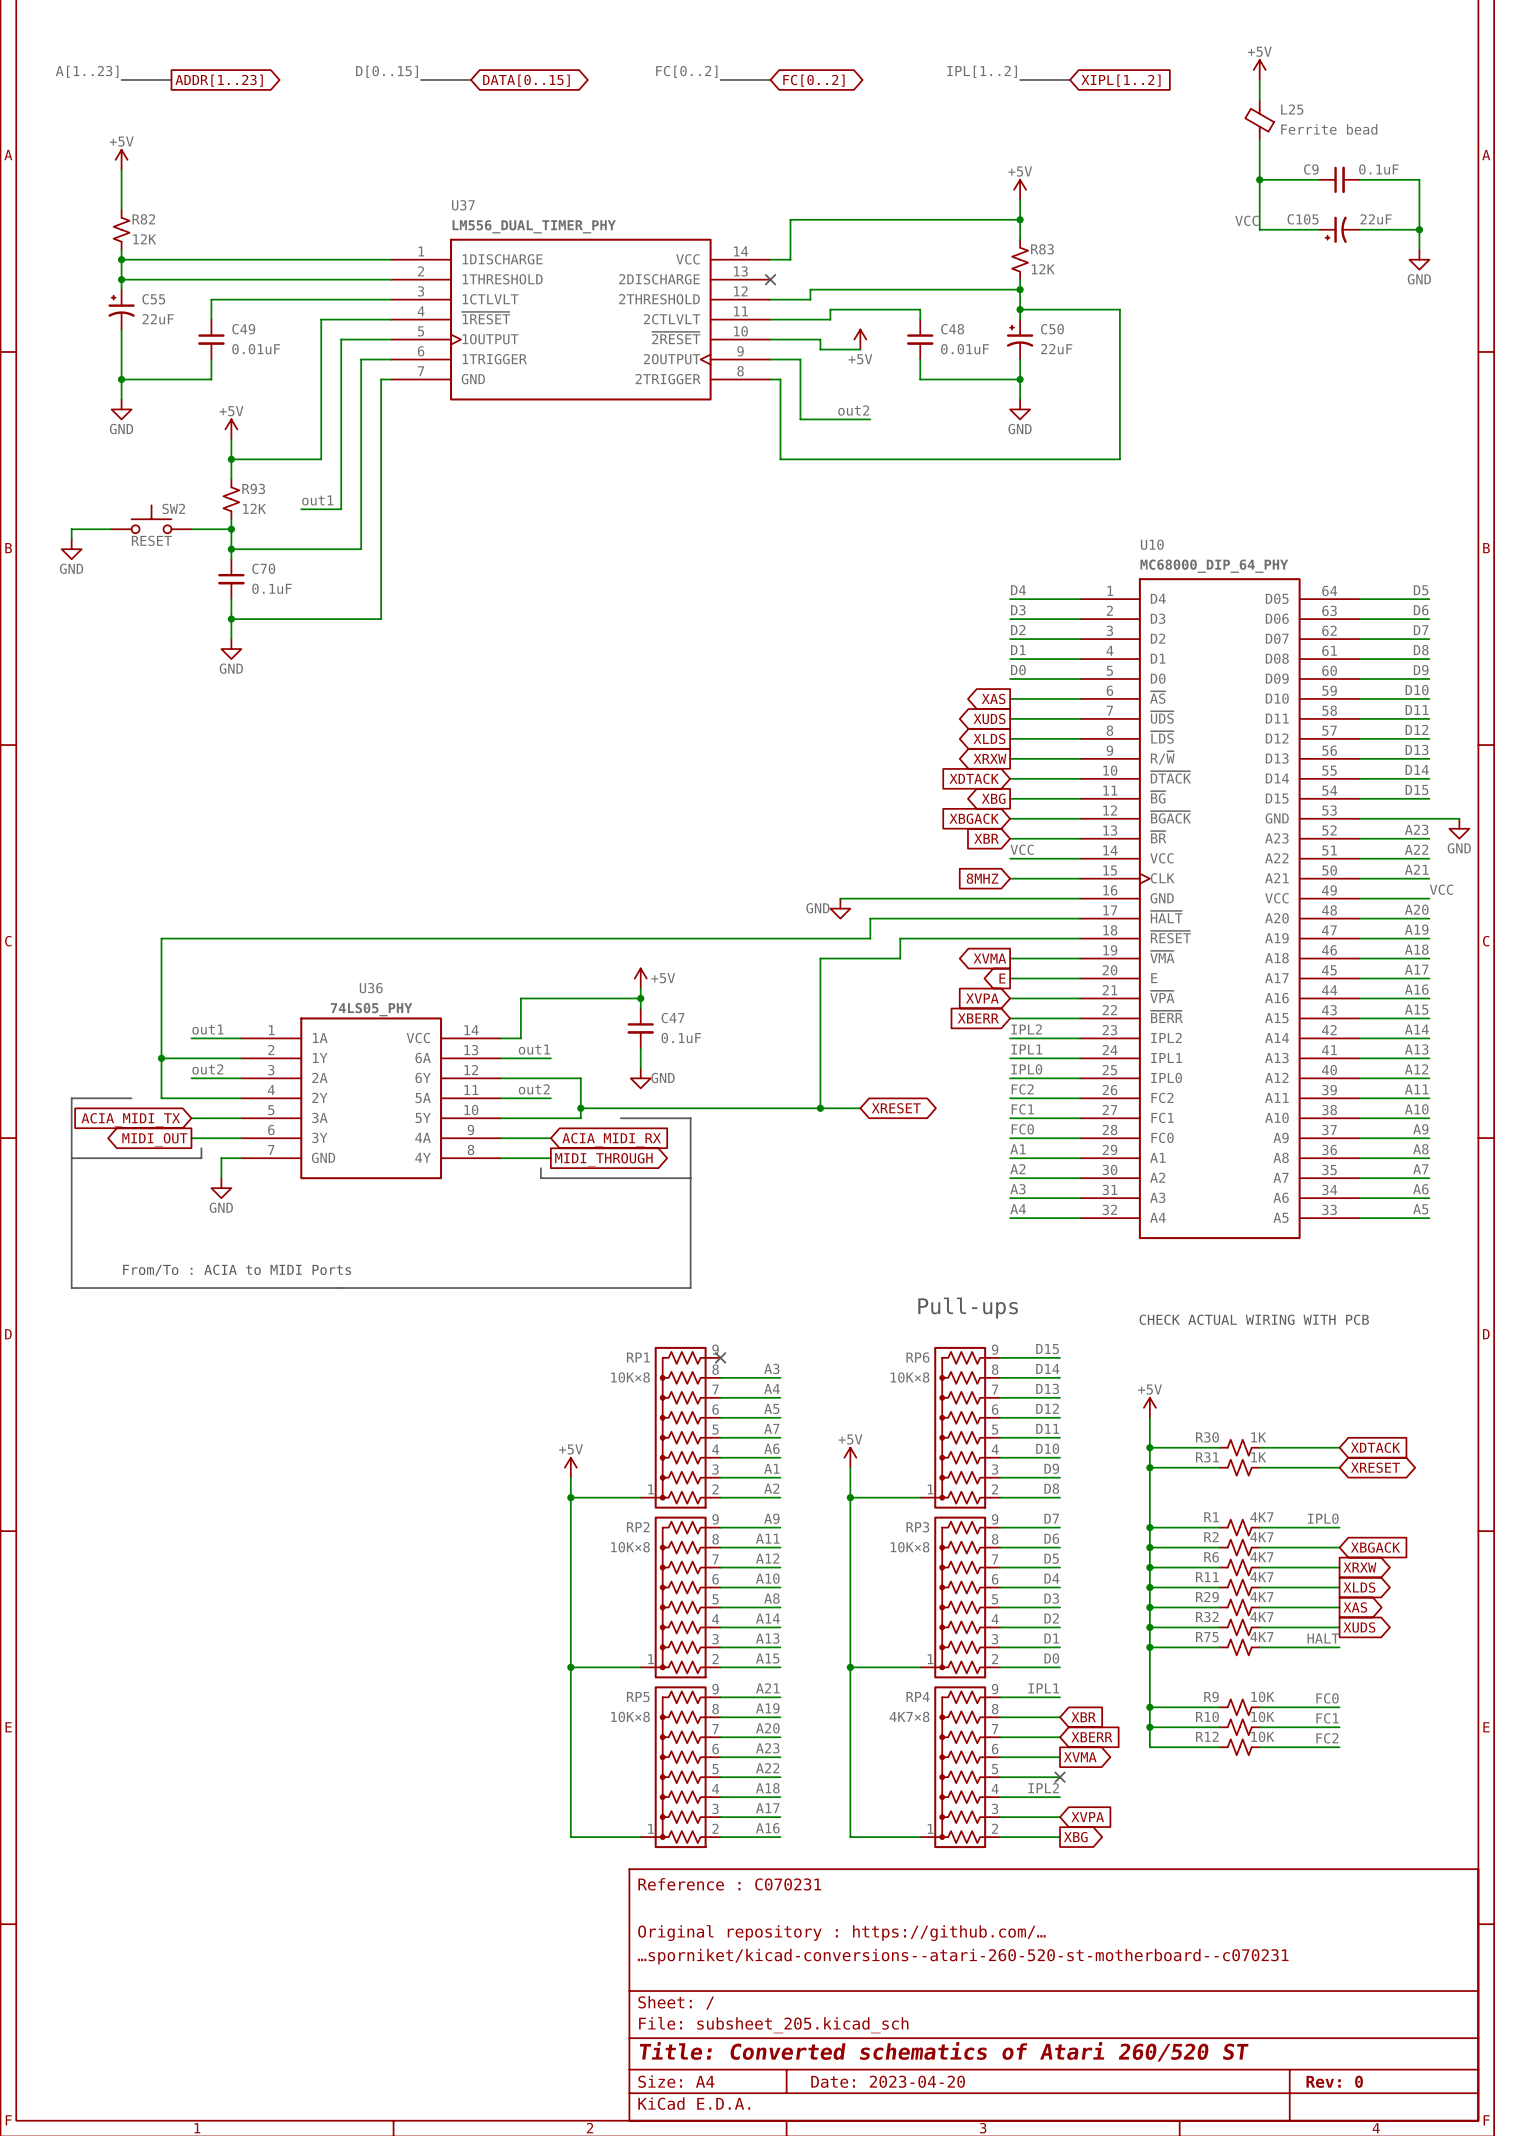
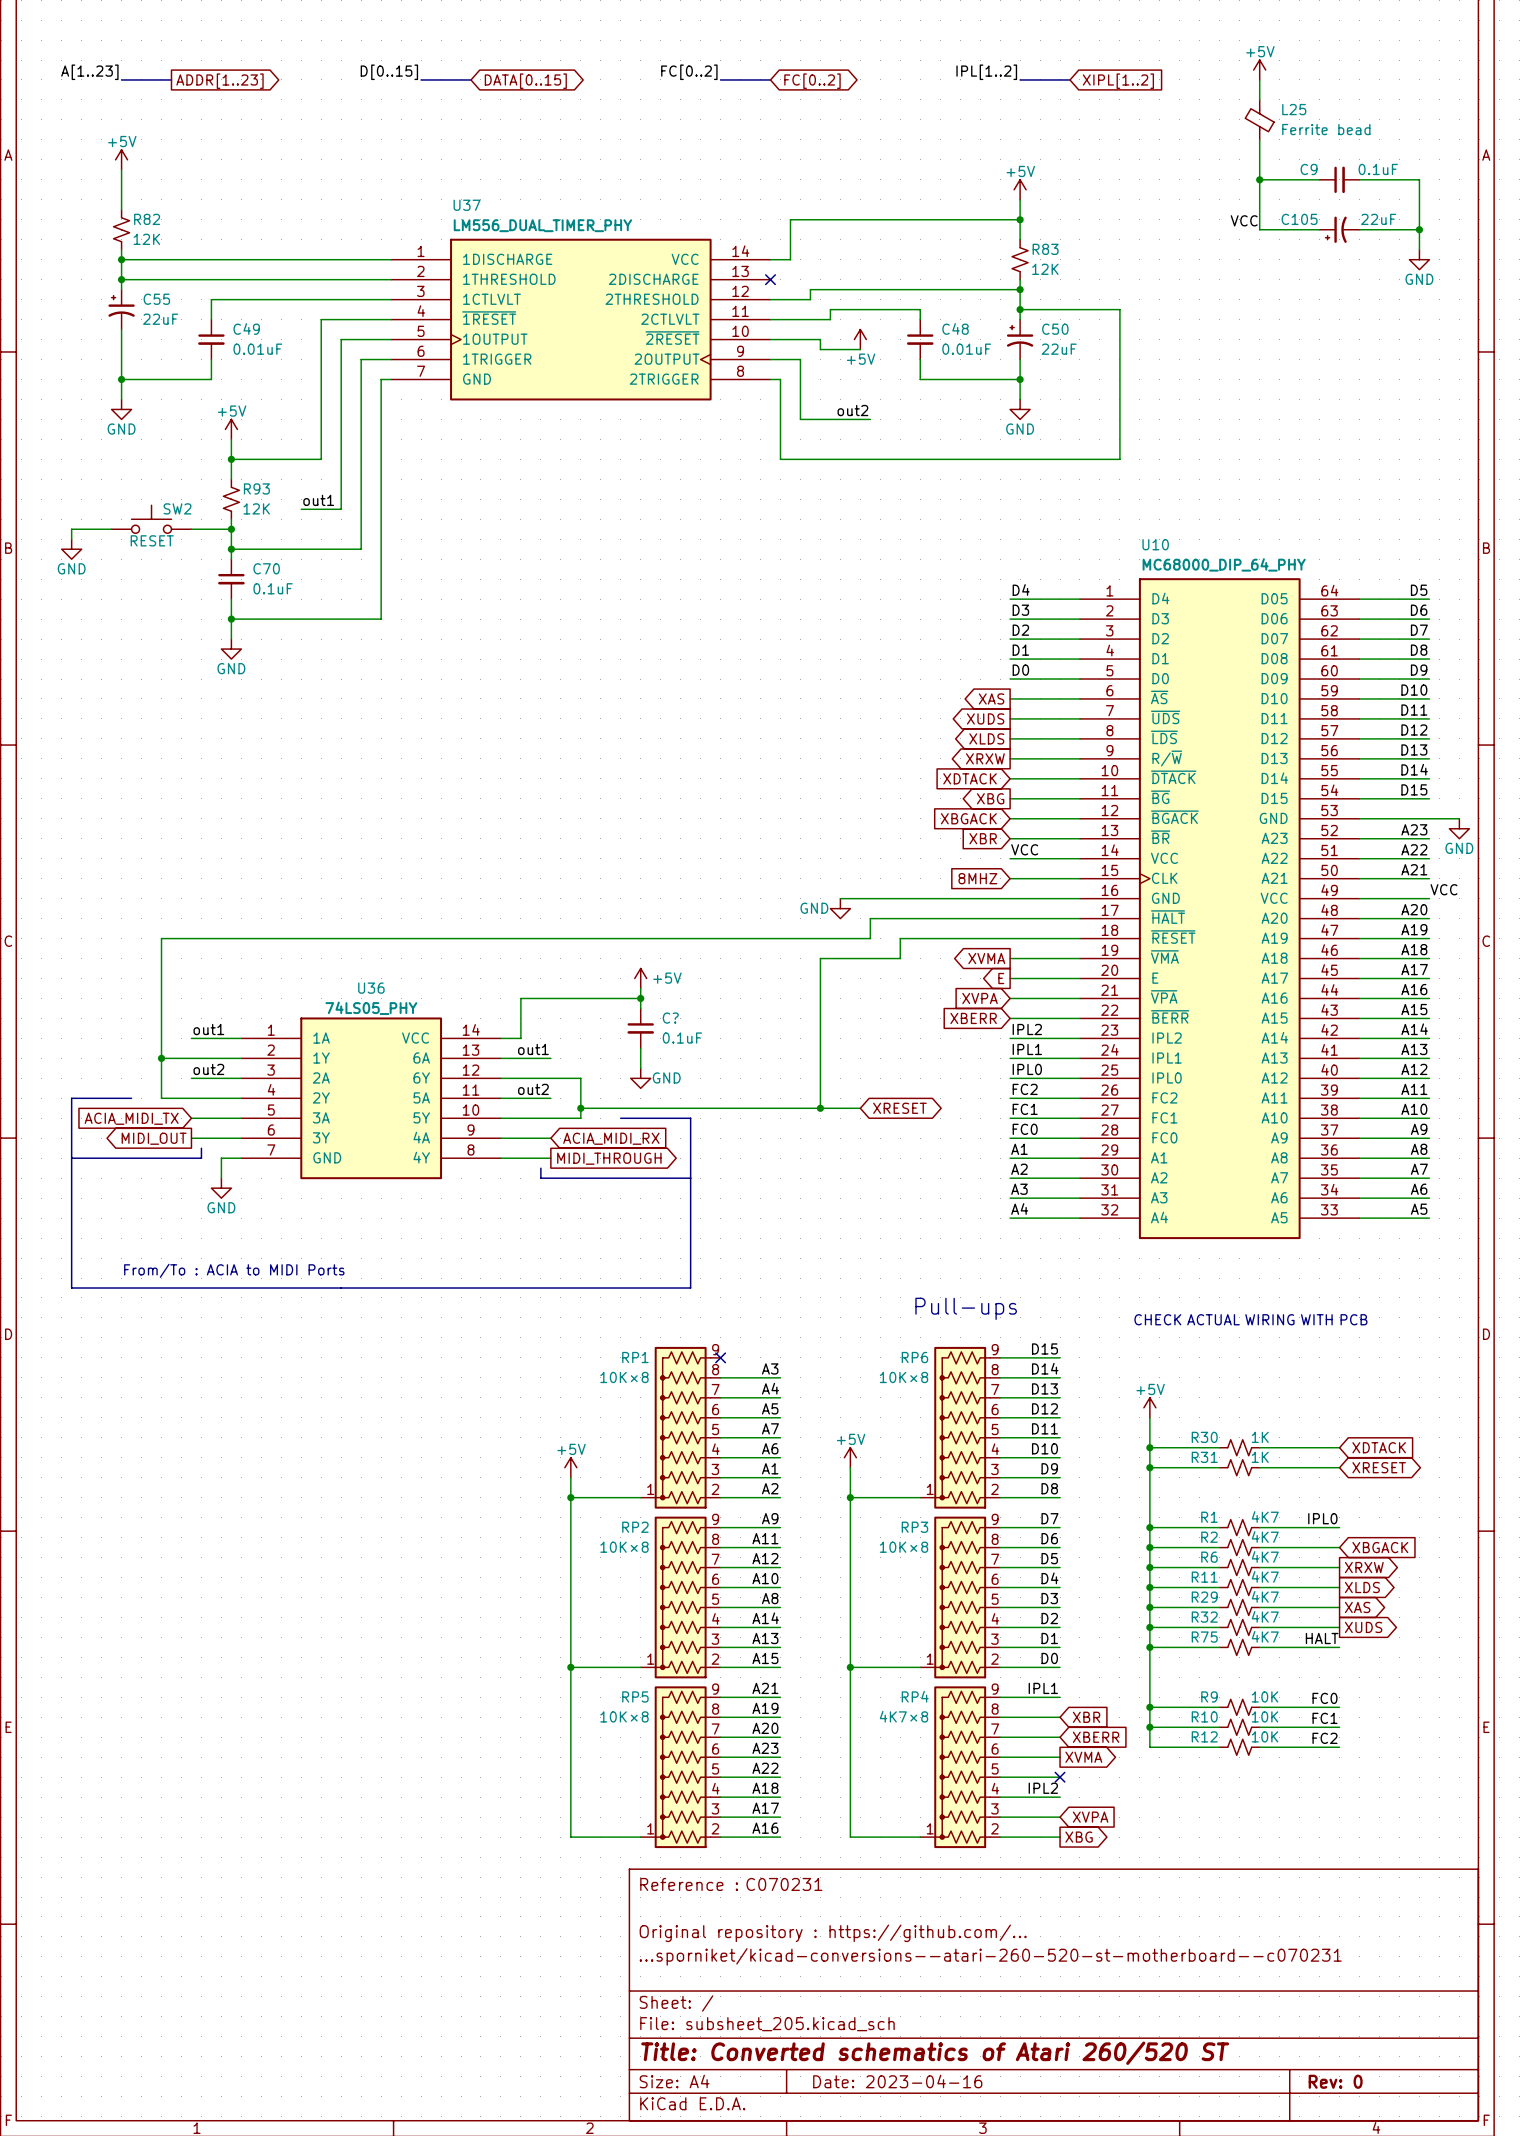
C47 name: C47 (673, 1018) -> C? (670, 1018)
title block: Date: 2023-04-20 (888, 2081) -> Date: 2023-04-16 (897, 2081)

